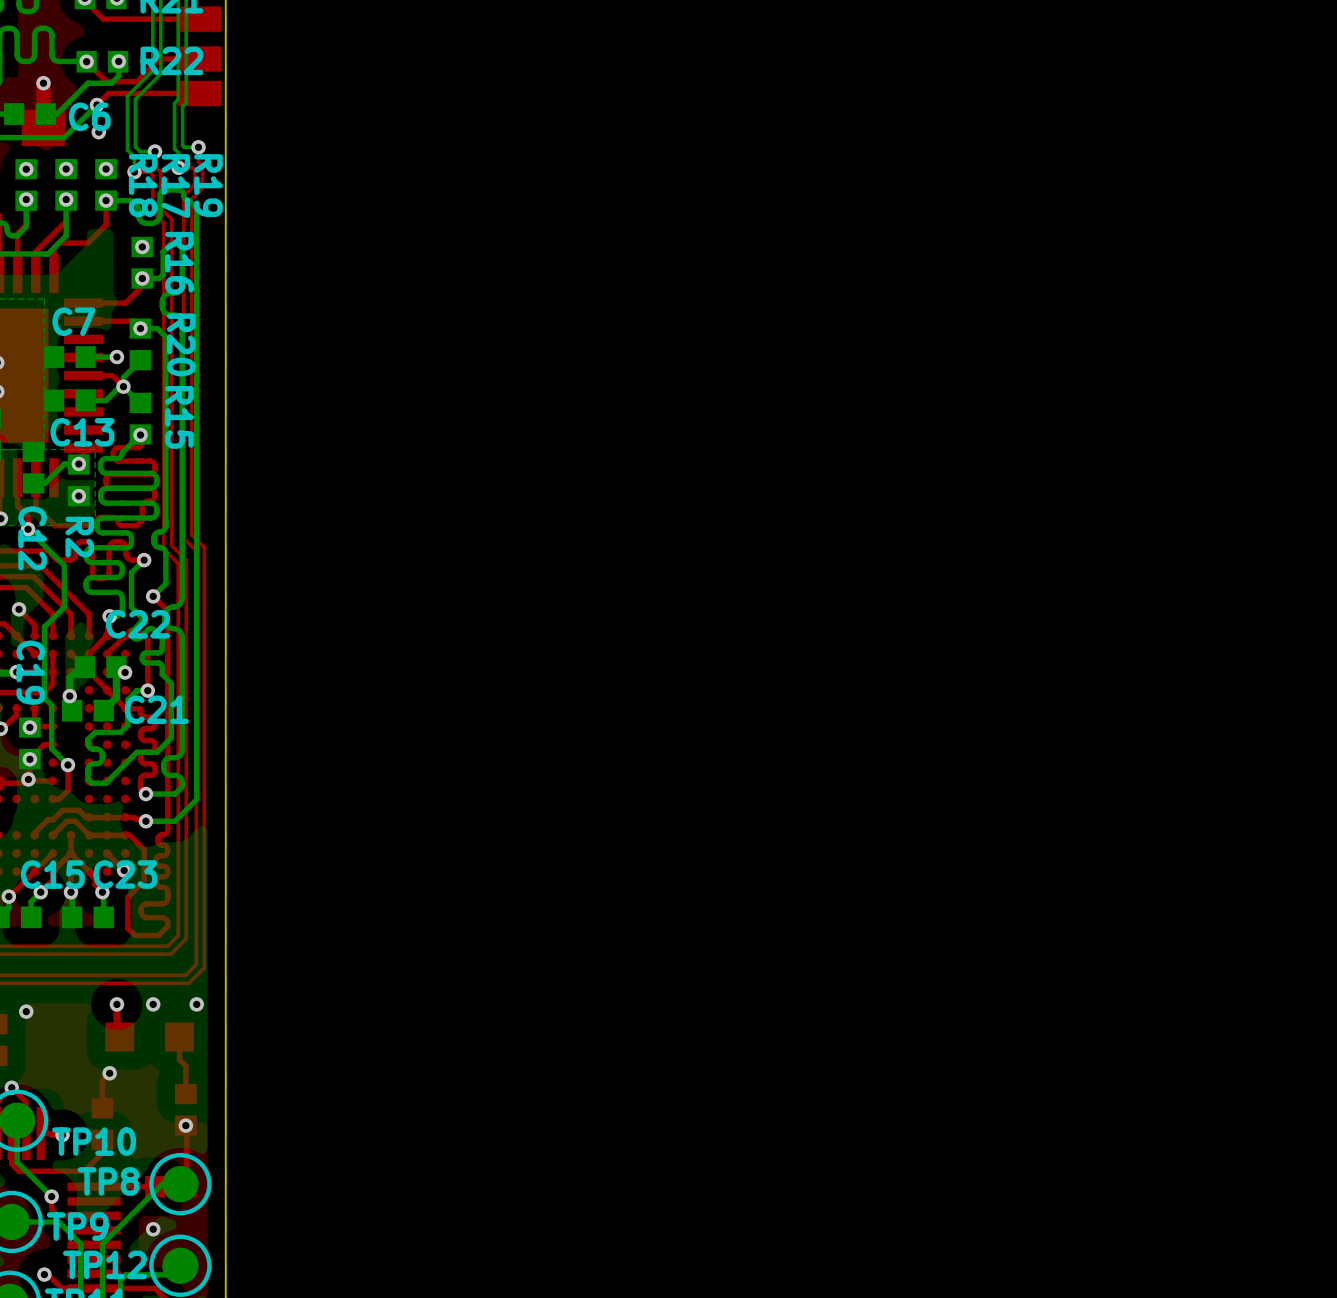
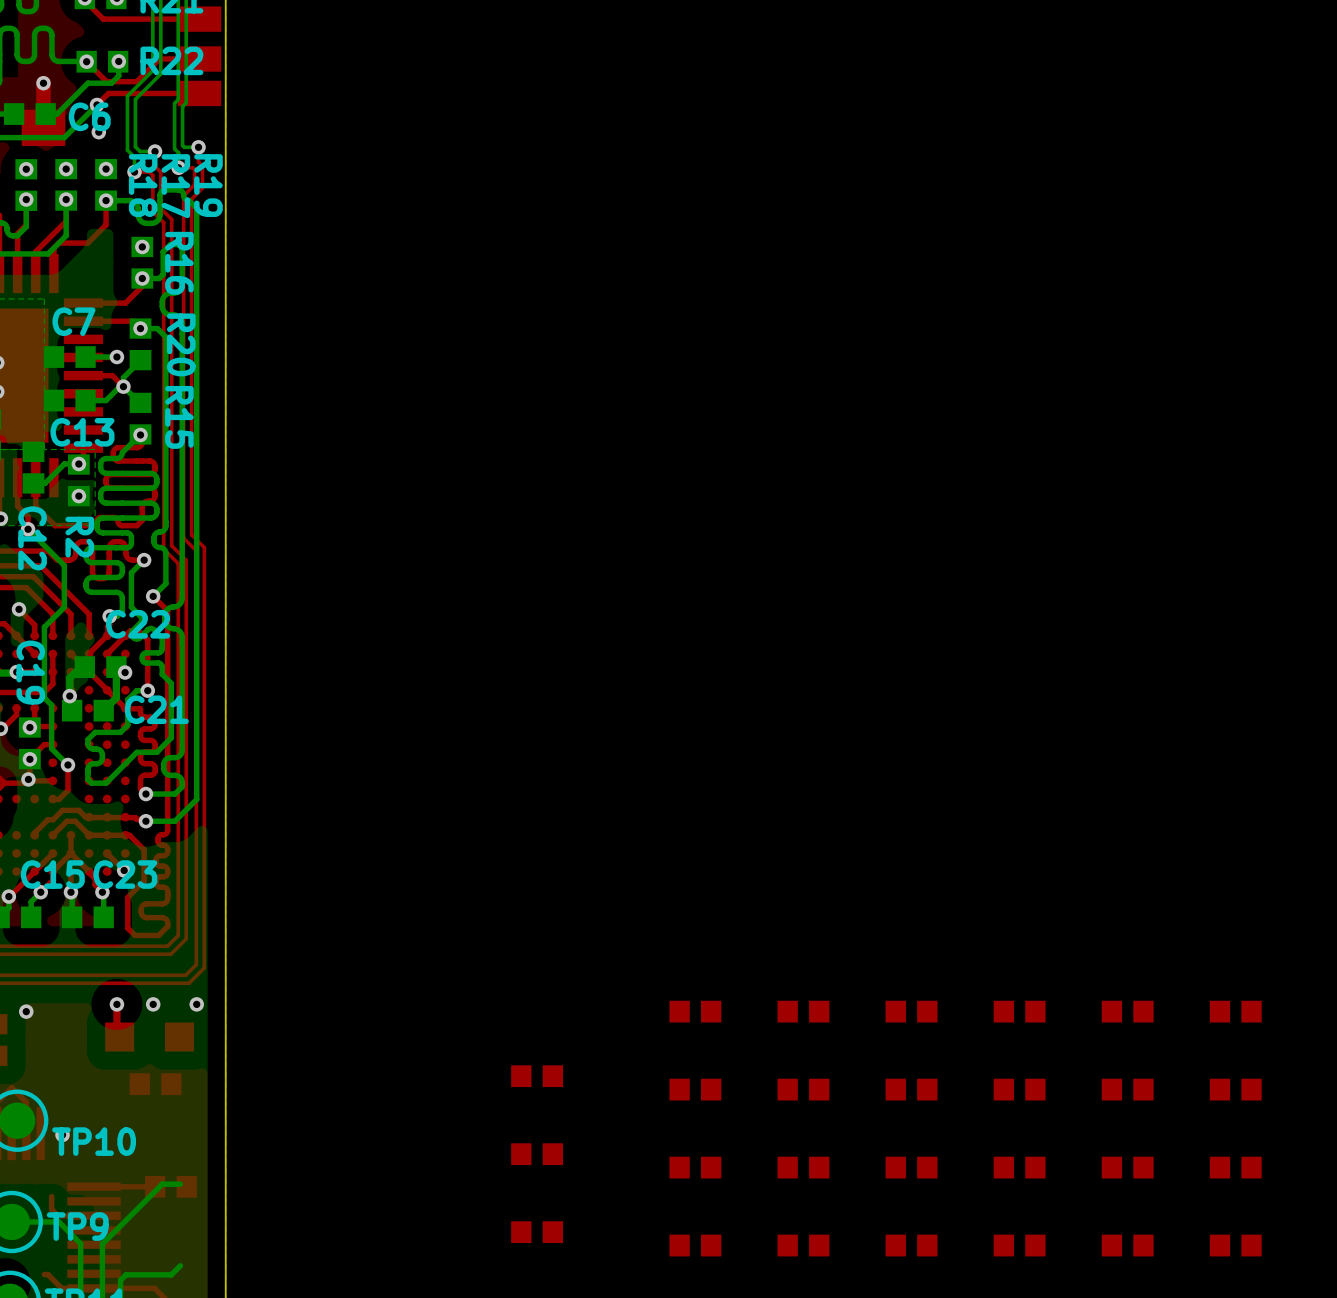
part: none -> (695, 1011)
part: none -> (803, 1011)
part: none -> (911, 1011)
part: none -> (1019, 1011)
part: none -> (1127, 1011)
part: none -> (1235, 1011)
top track: (179, 1037) (179, 1059) (185, 1066) (185, 1094) -> none
top track: (109, 1073) (102, 1080) (102, 1108) -> none
via: (109, 1073) -> none
part: none -> (537, 1076)
part: none -> (155, 1084)
via: (11, 1087) -> none
part: none -> (695, 1089)
part: none -> (803, 1089)
part: none -> (911, 1089)
part: none -> (1019, 1089)
part: none -> (1127, 1089)
part: none -> (1235, 1089)
part: (185, 1109) -> none
bottom track: (17, 1120) (17, 1162) (51, 1196) -> none
part: (102, 1124) -> none
via: (185, 1125) -> none
top track: (186, 1126) (186, 1186) -> none
top track: (11, 1133) (11, 1163) (19, 1171) (84, 1171) (102, 1153) (102, 1139) -> none
top track: (40, 1133) (62, 1134) -> none
part: none -> (537, 1154)
part: none -> (695, 1167)
part: none -> (803, 1167)
part: none -> (911, 1167)
part: none -> (1019, 1167)
part: none -> (1127, 1167)
part: none -> (1235, 1167)
TP8: (180, 1184) -> none
via: (51, 1196) -> none
via: (153, 1229) -> none
part: none -> (537, 1232)
part: none -> (695, 1245)
part: none -> (803, 1245)
part: none -> (911, 1245)
part: none -> (1019, 1245)
part: none -> (1127, 1245)
part: none -> (1235, 1245)
TP12: (180, 1265) -> none
via: (44, 1274) -> none

